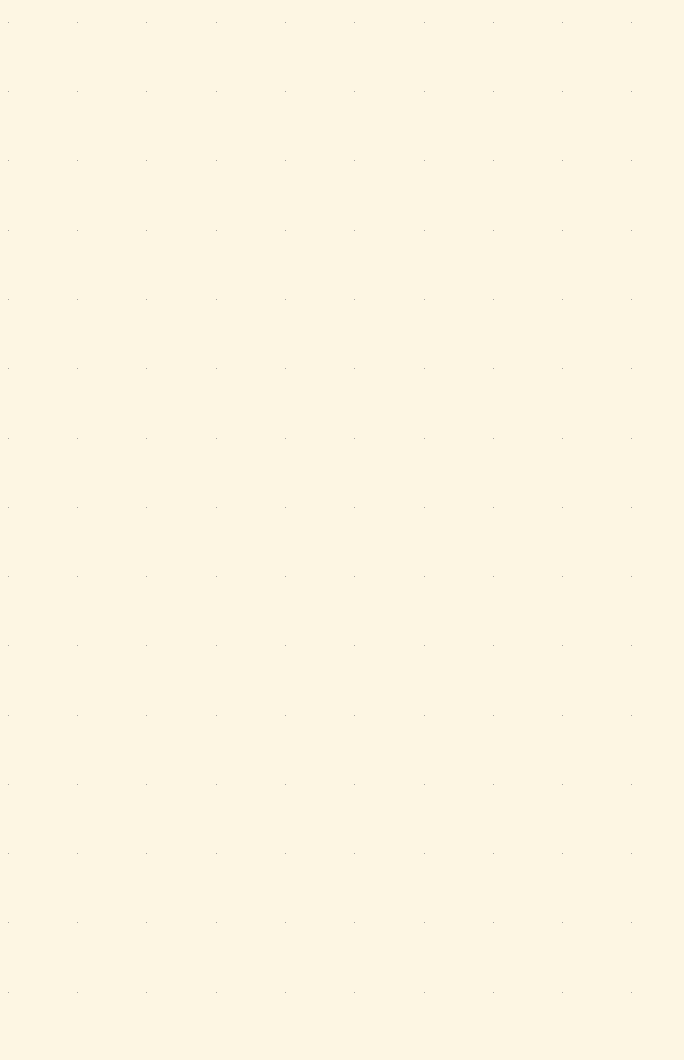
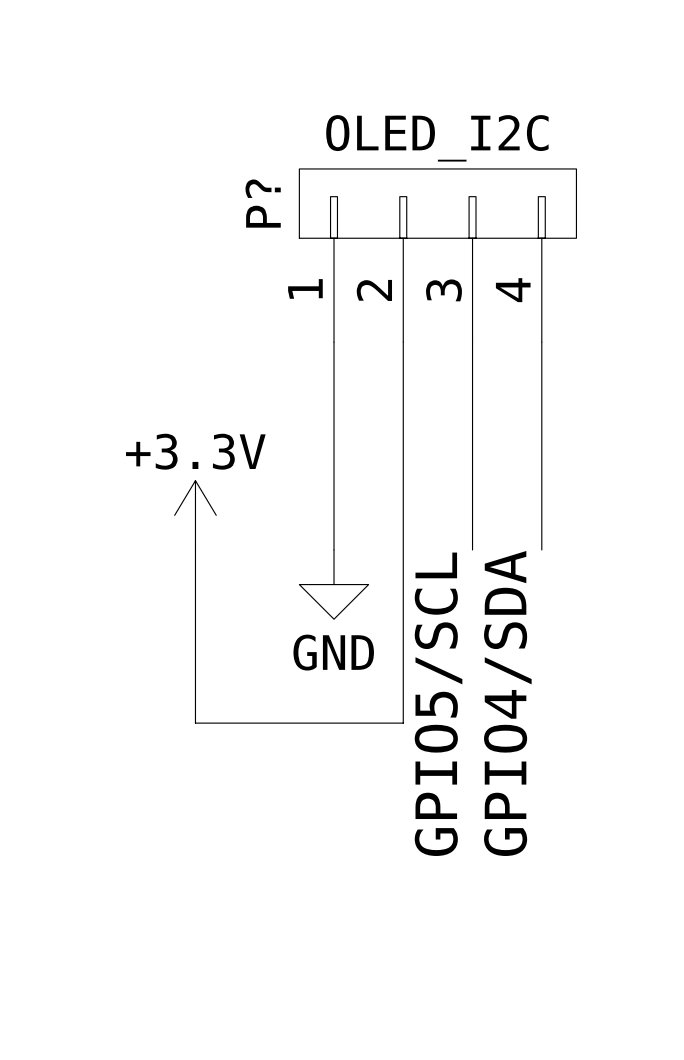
P?: none -> OLED_I2C (437, 255)
wire: none -> (334, 342) (334, 549)
wire: none -> (403, 342) (403, 723) (195, 723) (195, 549)
wire: none -> (472, 342) (472, 549)
wire: none -> (541, 342) (541, 549)
power symbol: none -> +3.3V (195, 515)
power symbol: none -> GND (334, 584)
label: none -> GPIO5/SCL (438, 704)
label: none -> GPIO4/SDA (507, 703)

